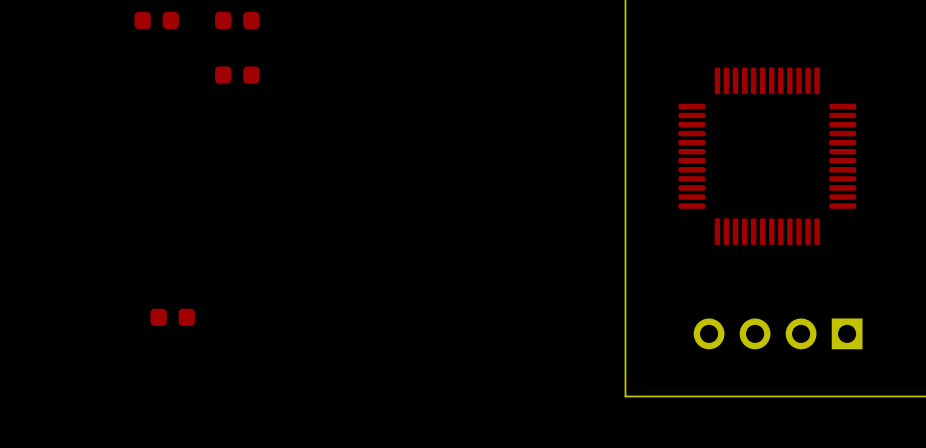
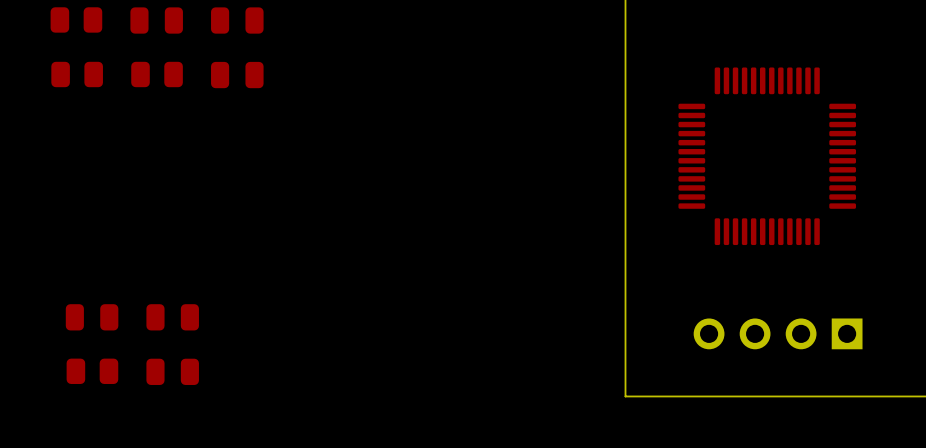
part footprint: [134, 11, 179, 30] -> [130, 7, 183, 34]
part footprint: [215, 11, 260, 30] -> [211, 7, 264, 34]
part: none -> (76, 19)
part footprint: [215, 66, 260, 84] -> [211, 61, 264, 89]
part: none -> (77, 74)
part: none -> (157, 74)
part footprint: [150, 308, 195, 326] -> [146, 304, 199, 331]
part: none -> (92, 317)
part: none -> (92, 371)
part: none -> (172, 371)

